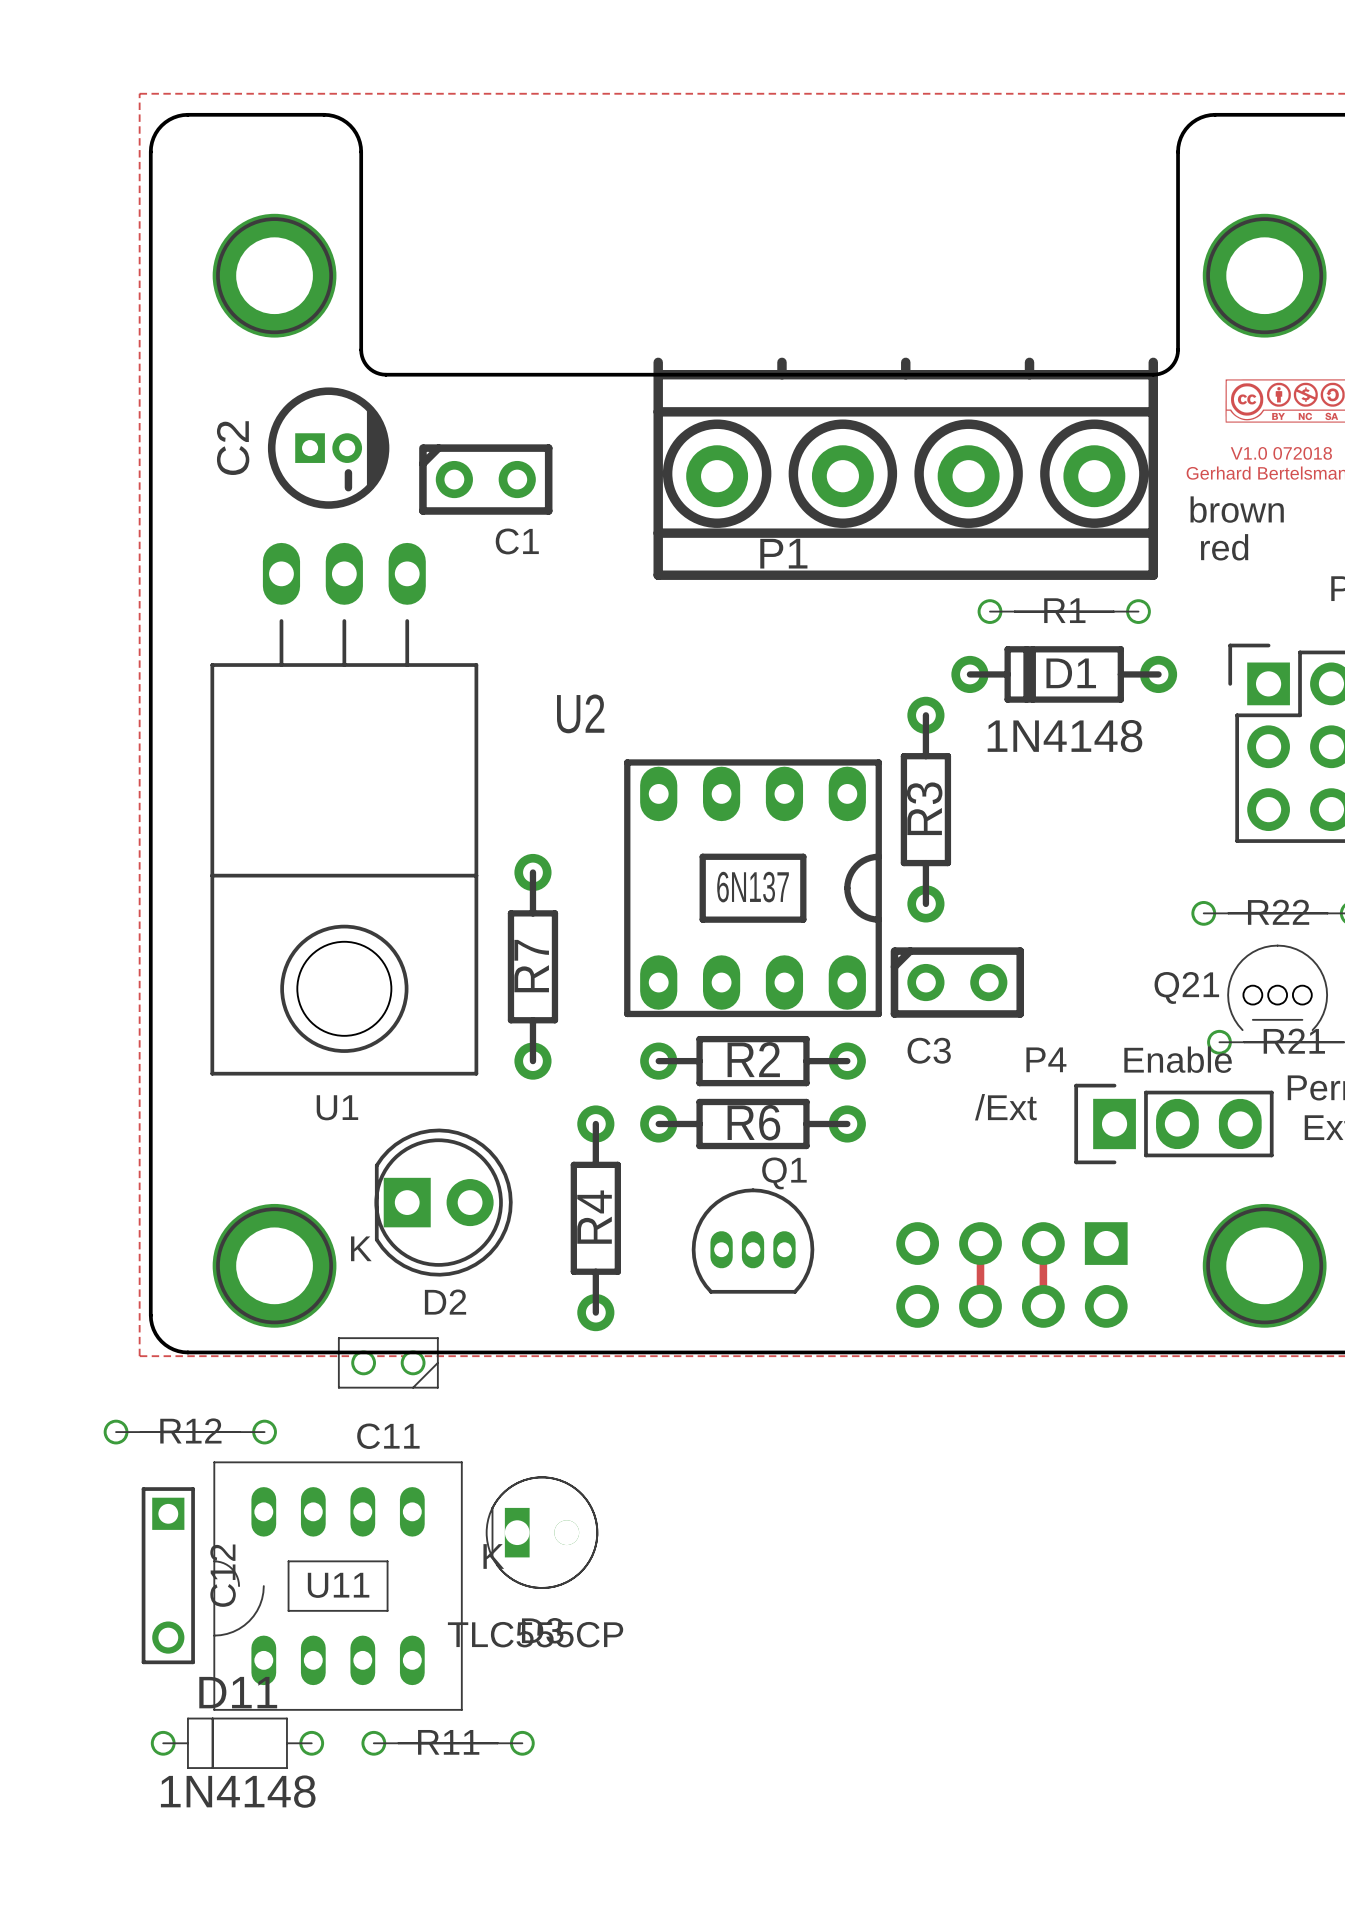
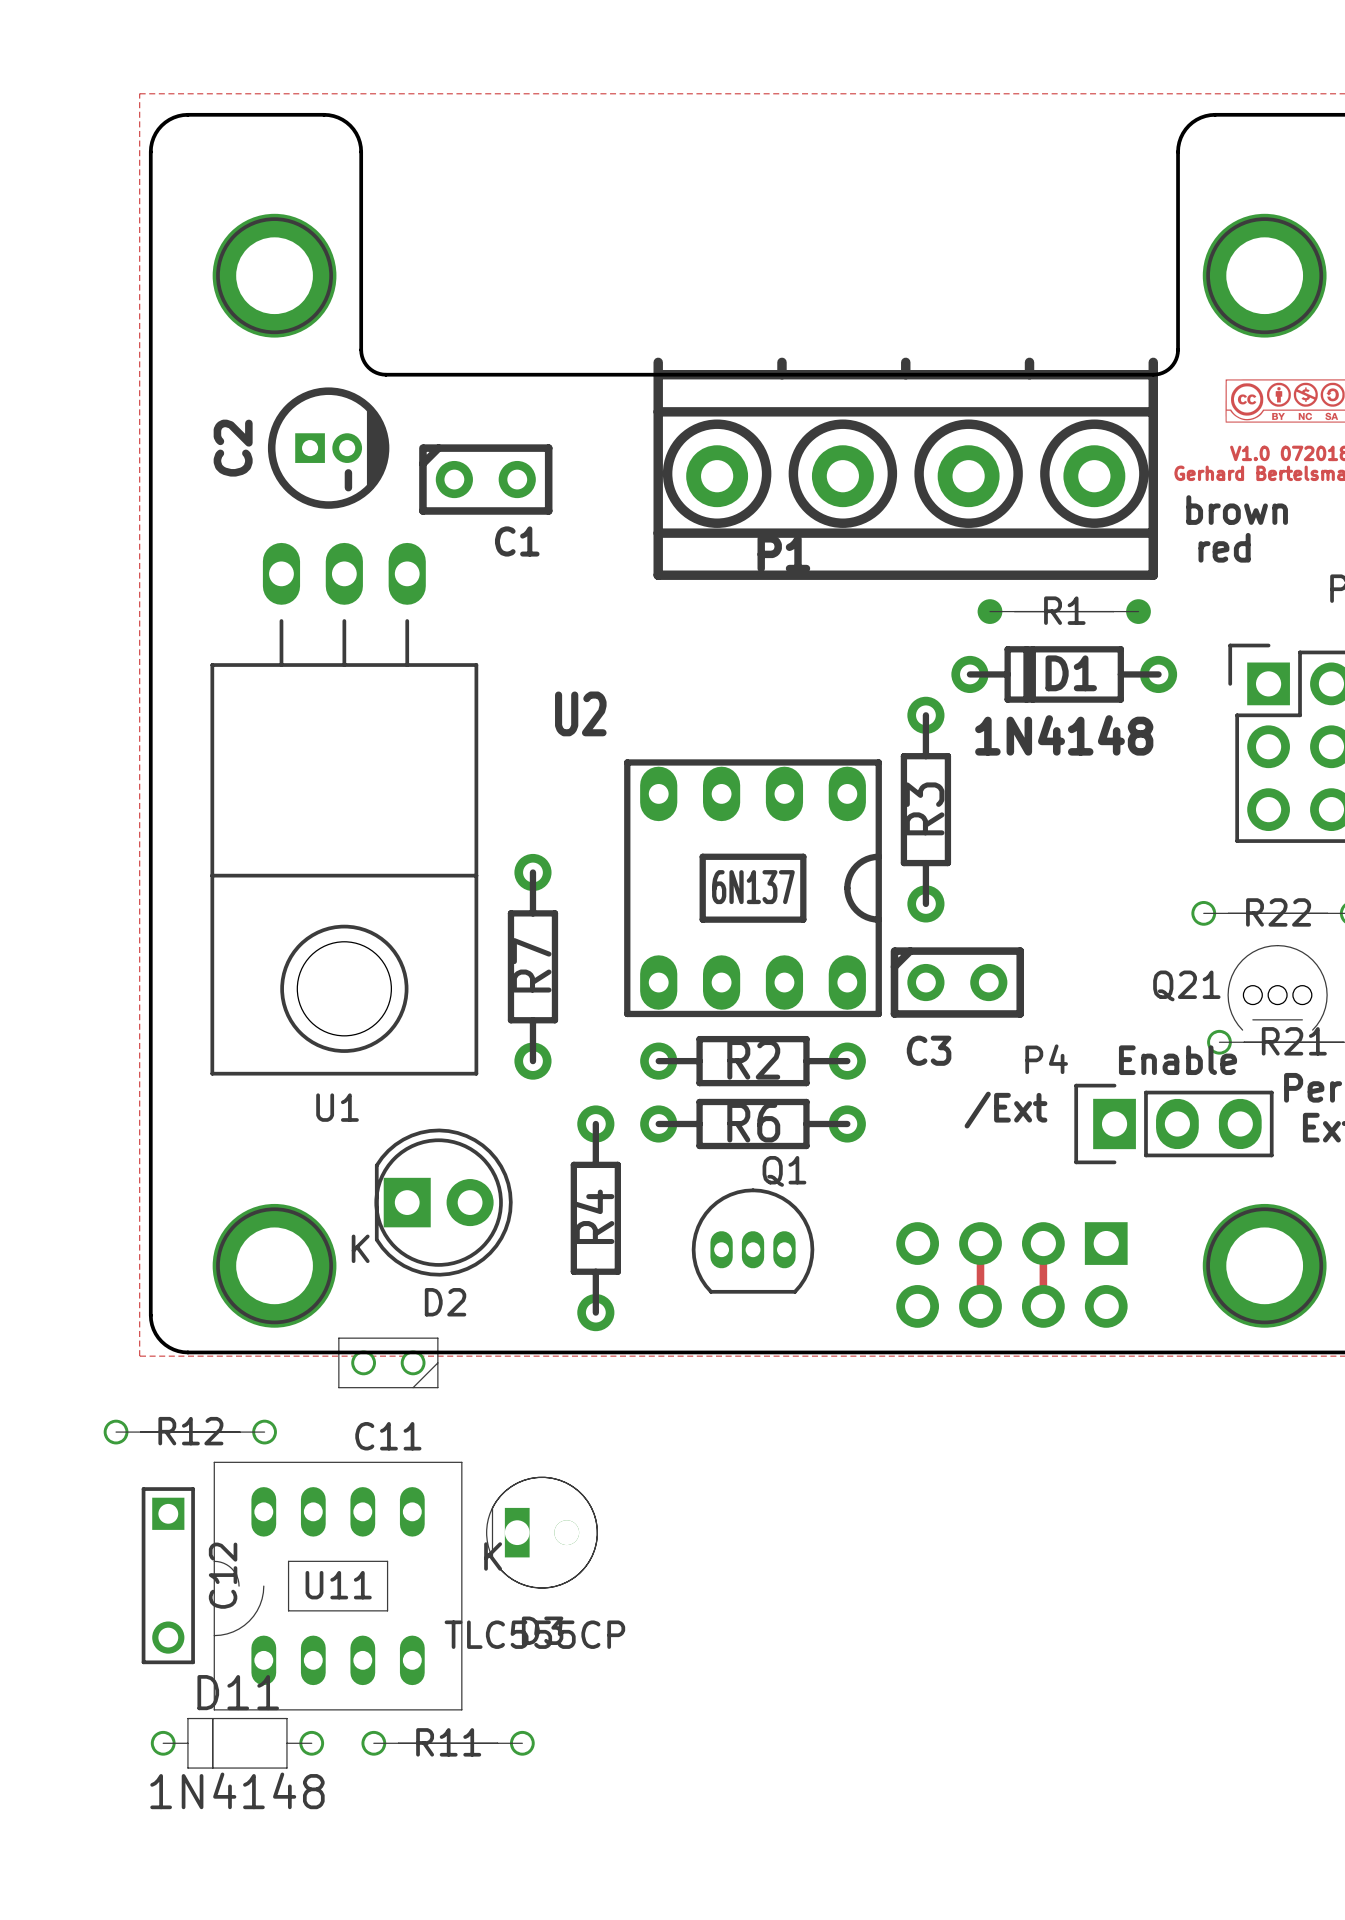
R1 footprint: [977, 599, 1151, 624] -> [977, 599, 1151, 624]

